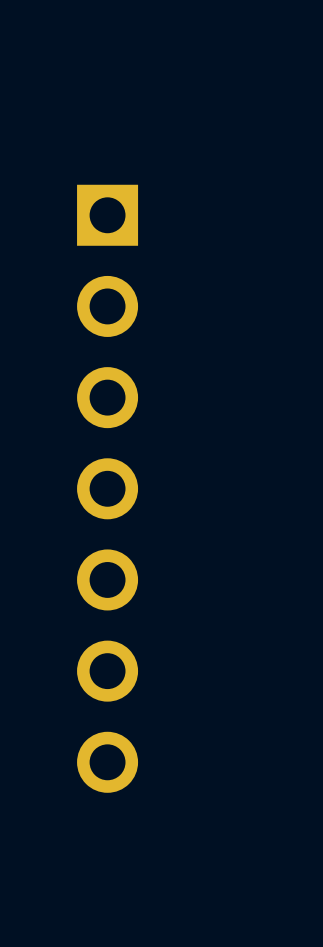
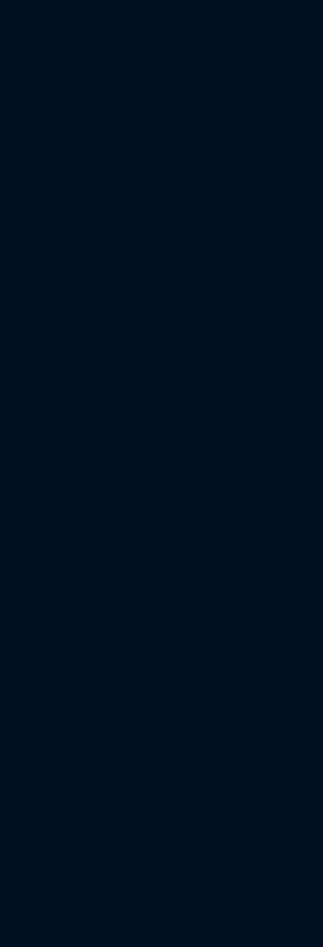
part: (107, 488) -> none

